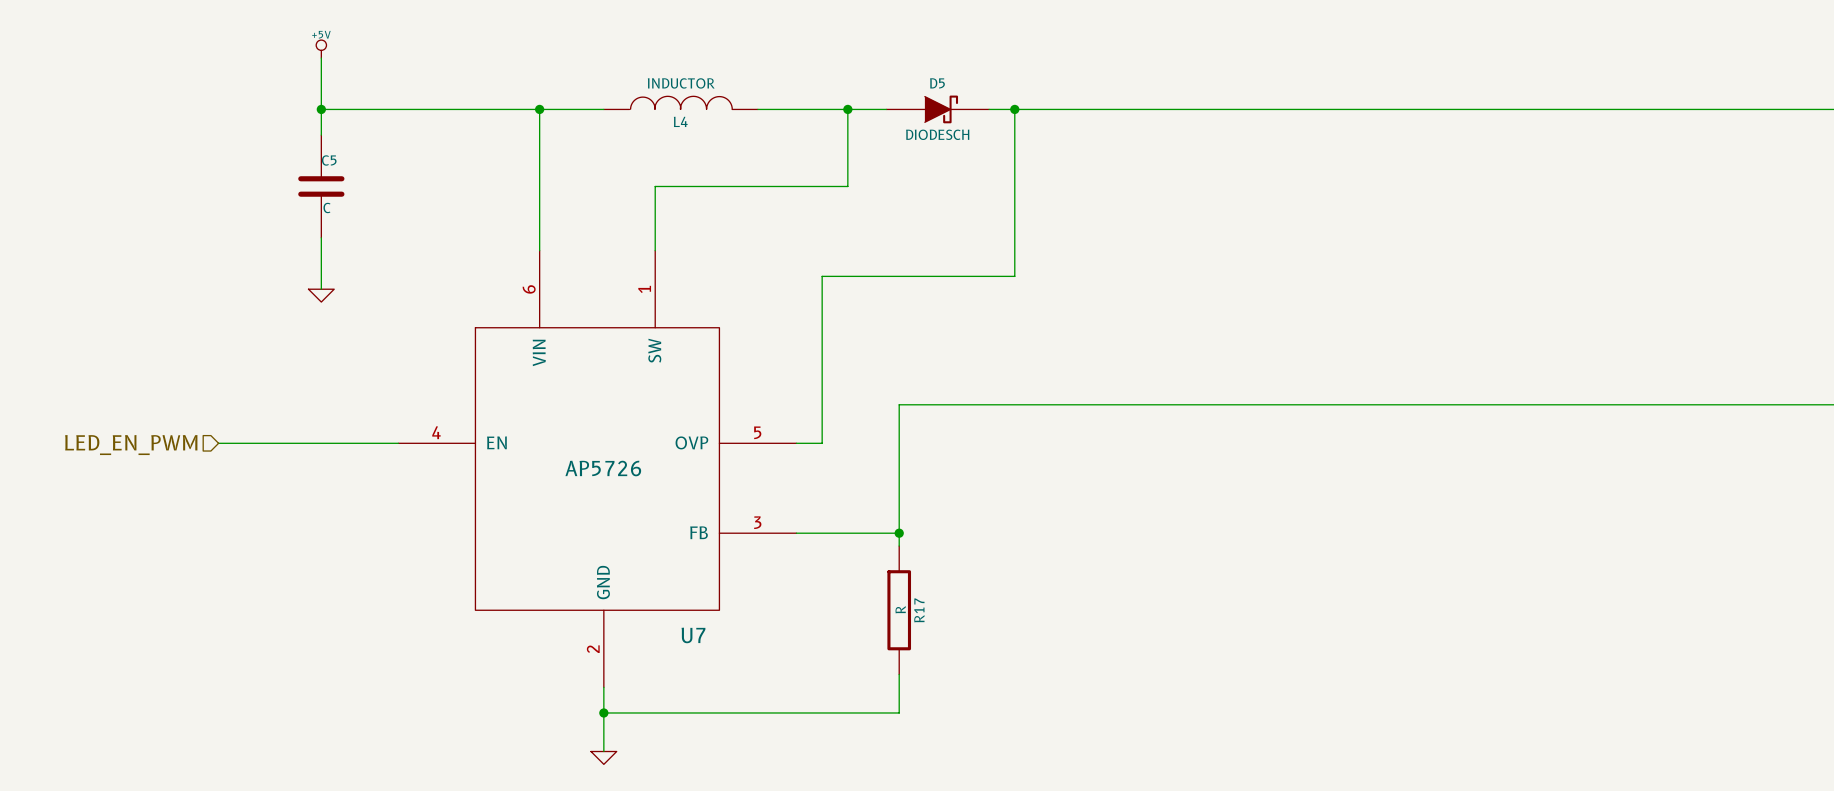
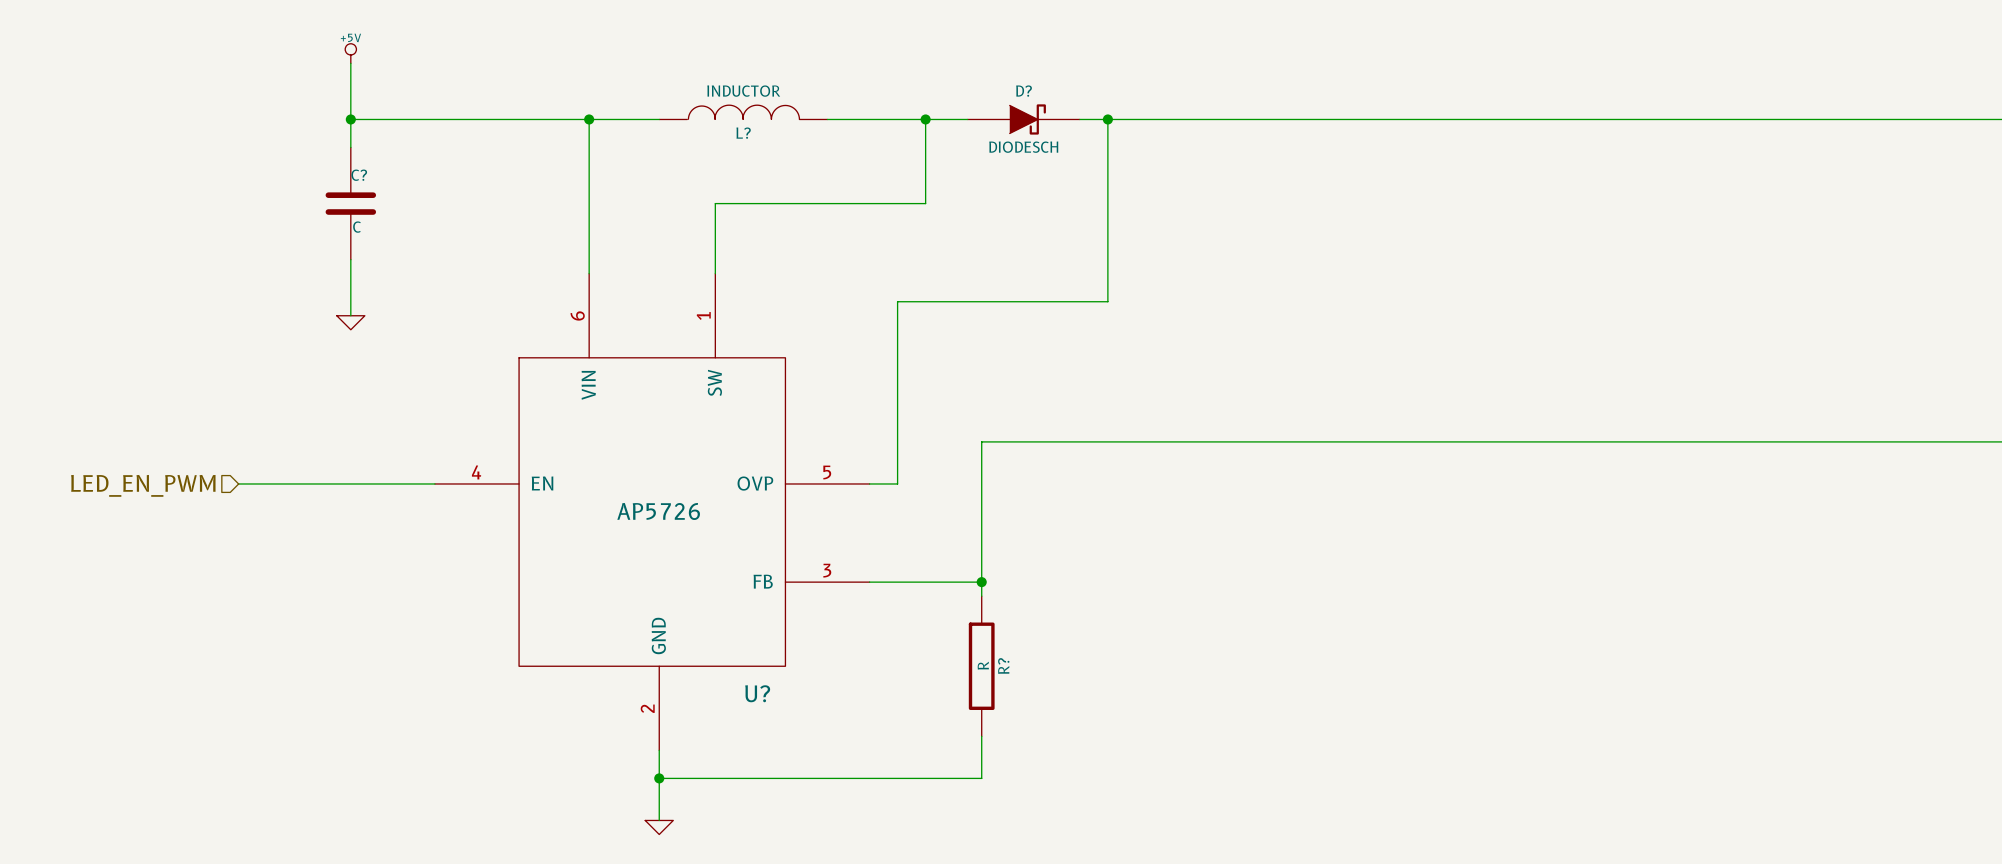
D5 name: D5 (937, 83) -> D? (1024, 91)
L4 name: L4 (680, 121) -> L? (743, 133)
C5 name: C5 (329, 160) -> C? (359, 175)
R17 name: R17 (919, 610) -> R? (1003, 666)
U7 name: U7 (693, 635) -> U? (757, 693)

